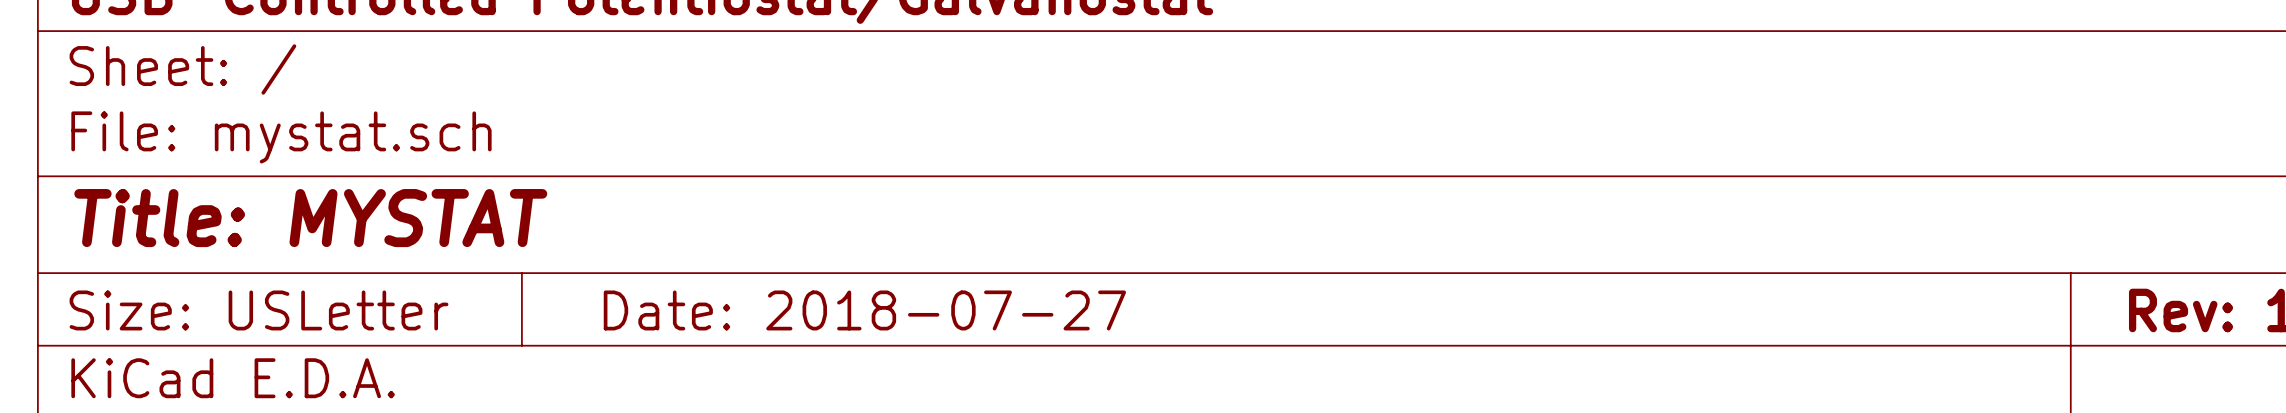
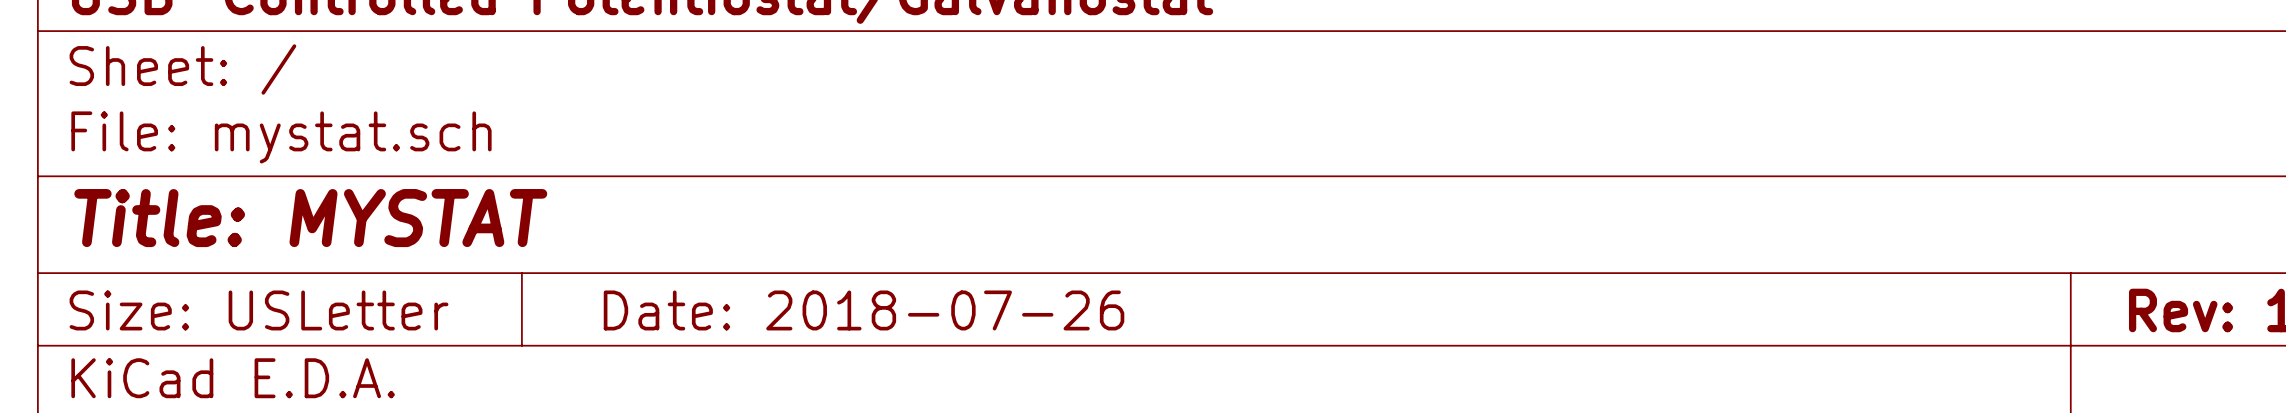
title block: Date: 2018-07-27 (864, 310) -> Date: 2018-07-26 (864, 310)

